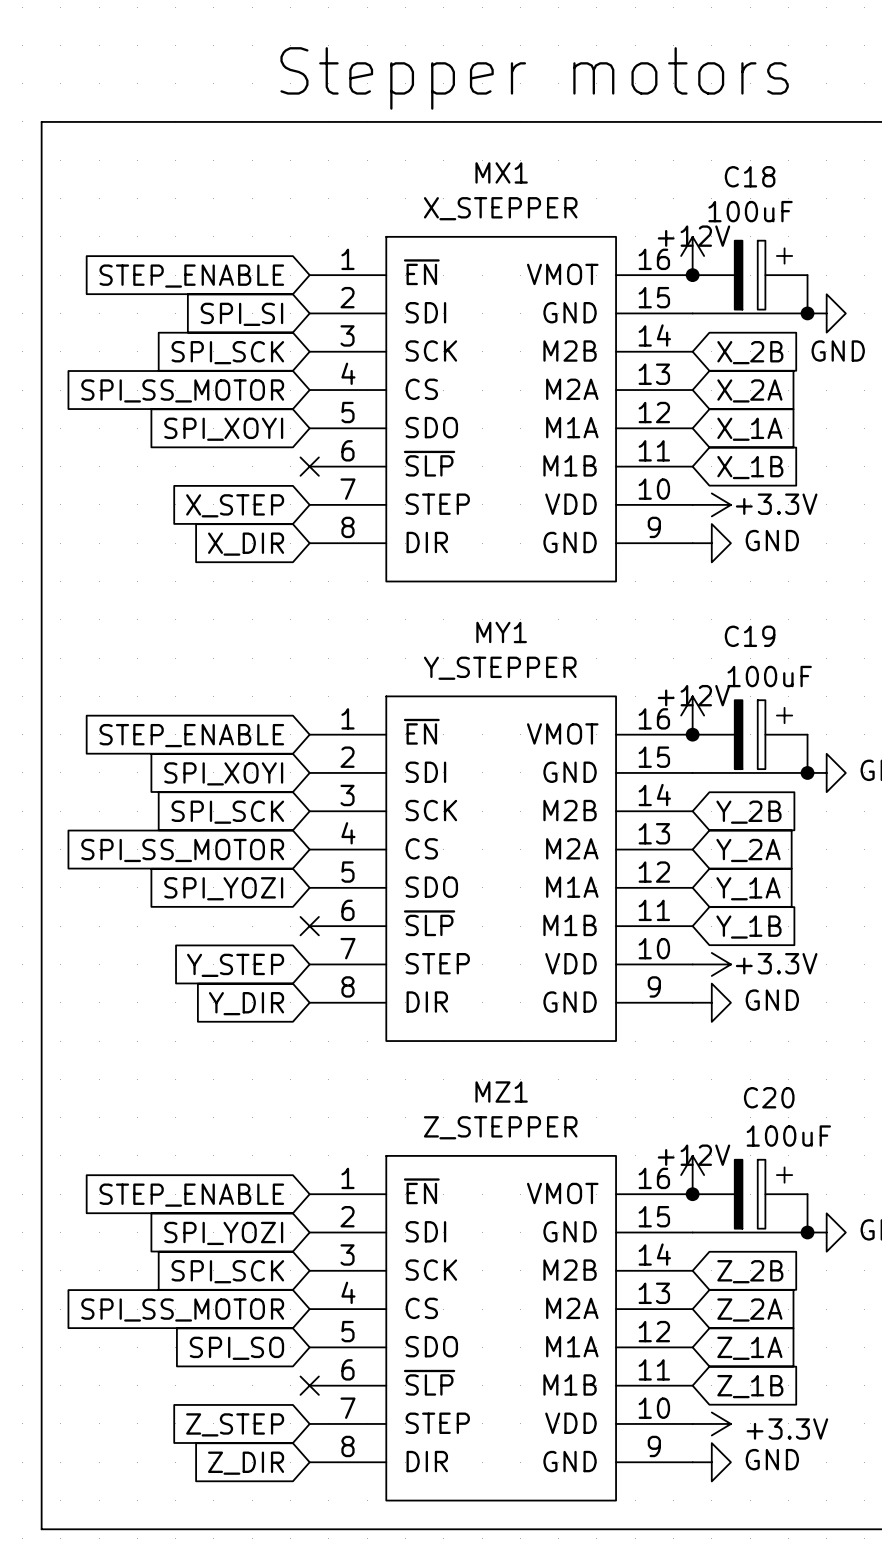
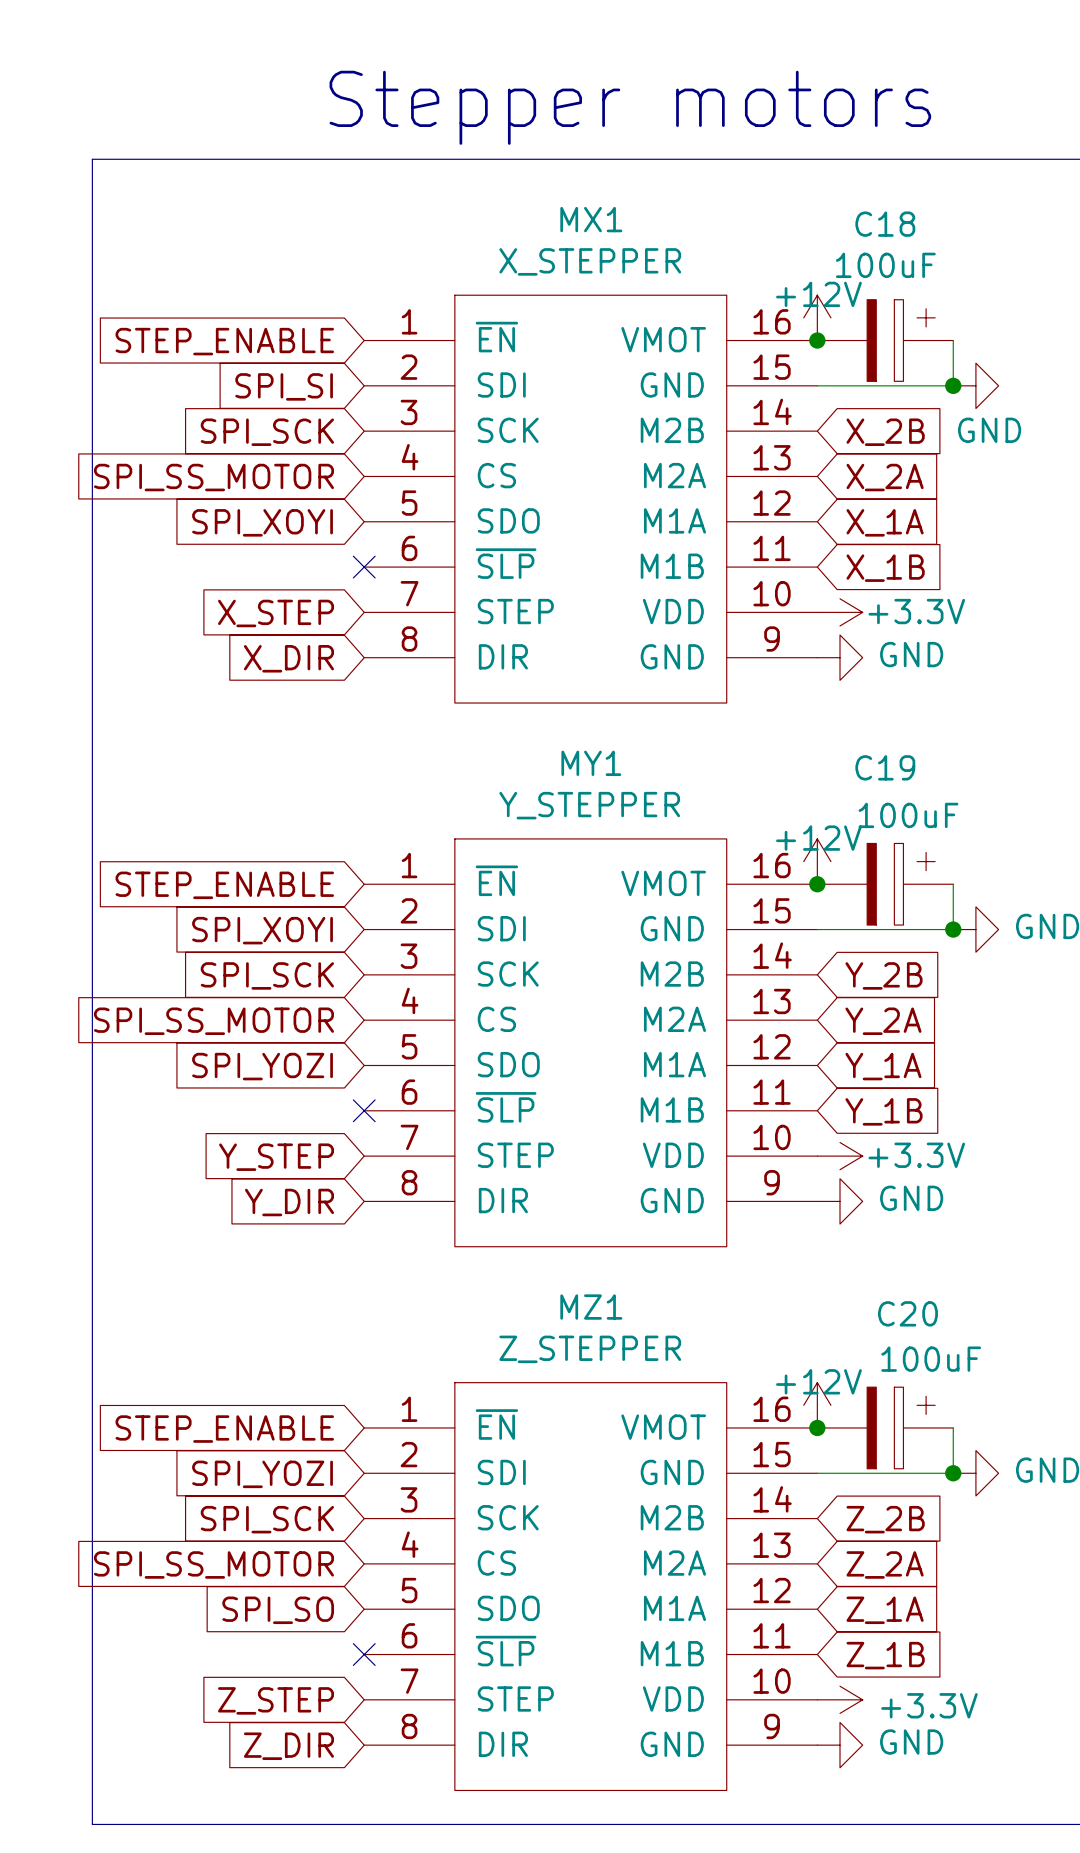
line: (79, 121) (41, 121) (41, 1529) (79, 1529) -> (92, 159) (92, 1824)

